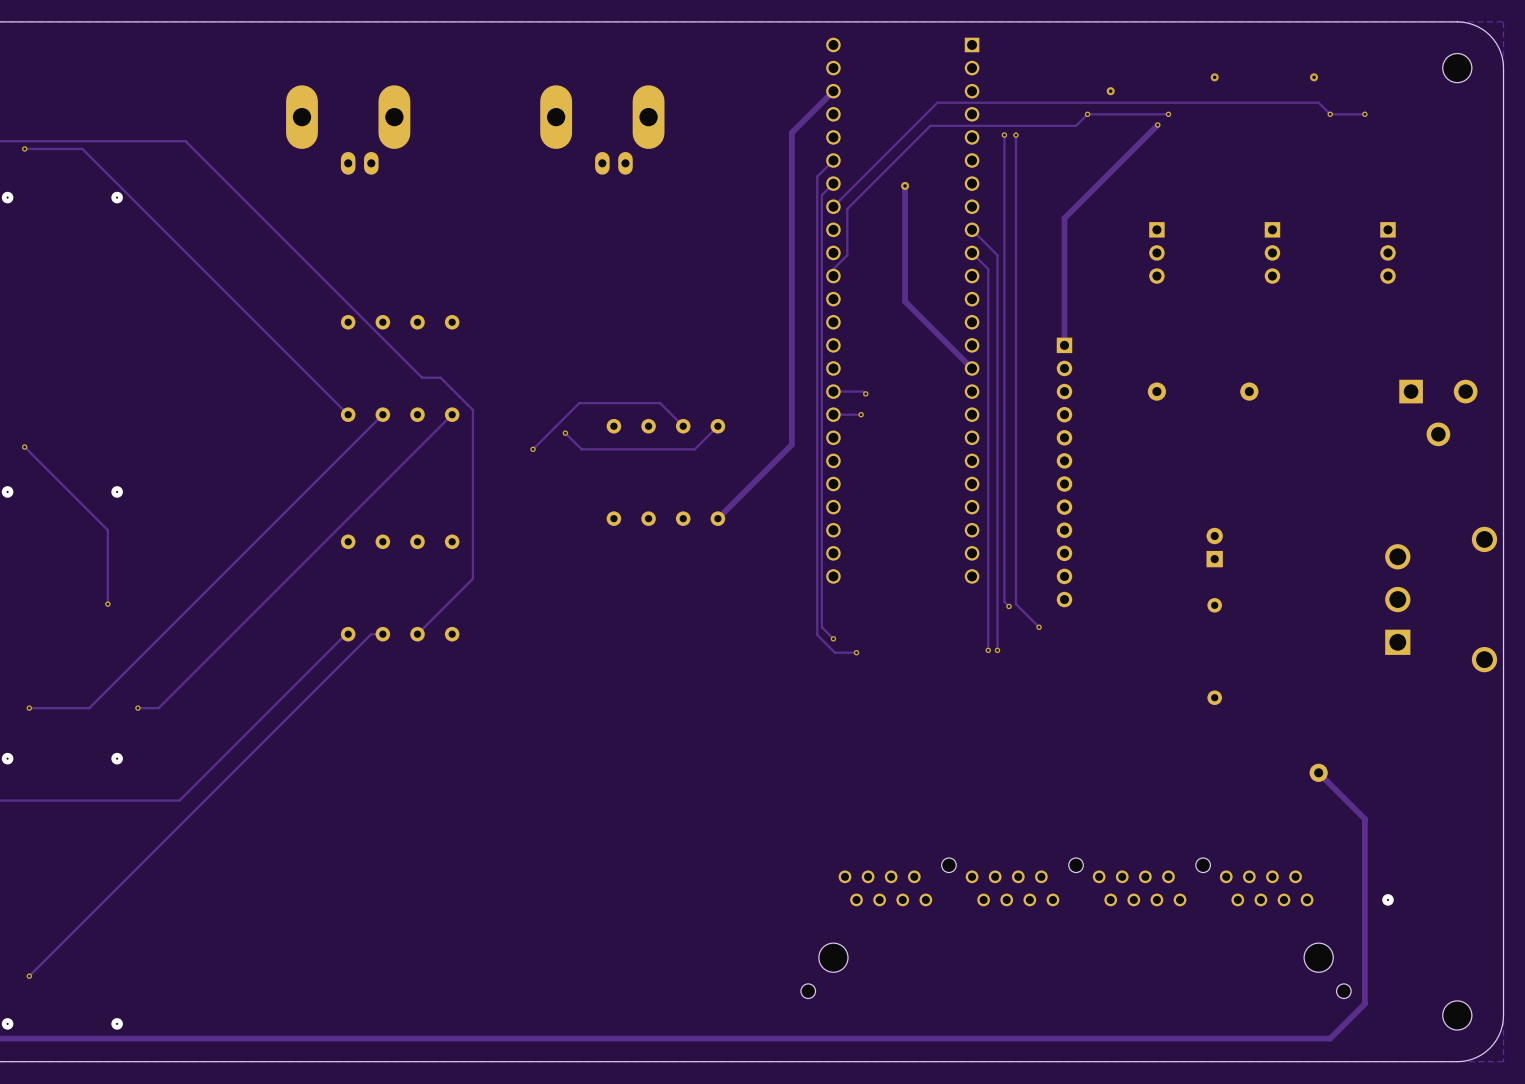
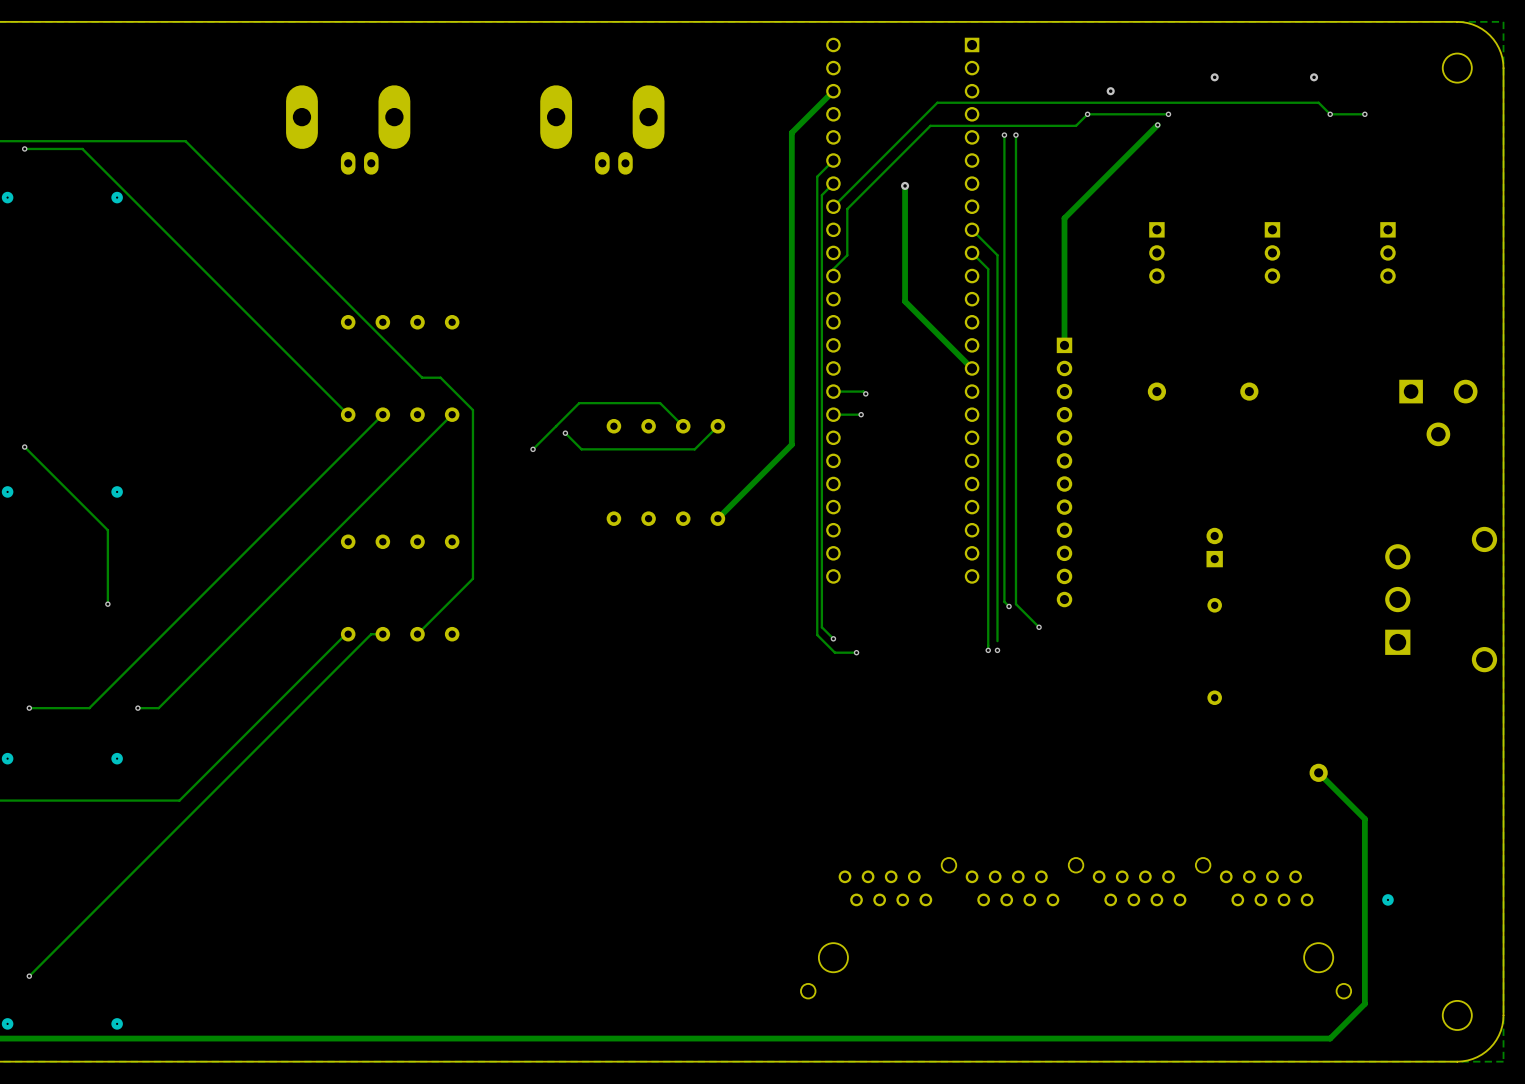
track: (997, 641) (997, 650) -> none

